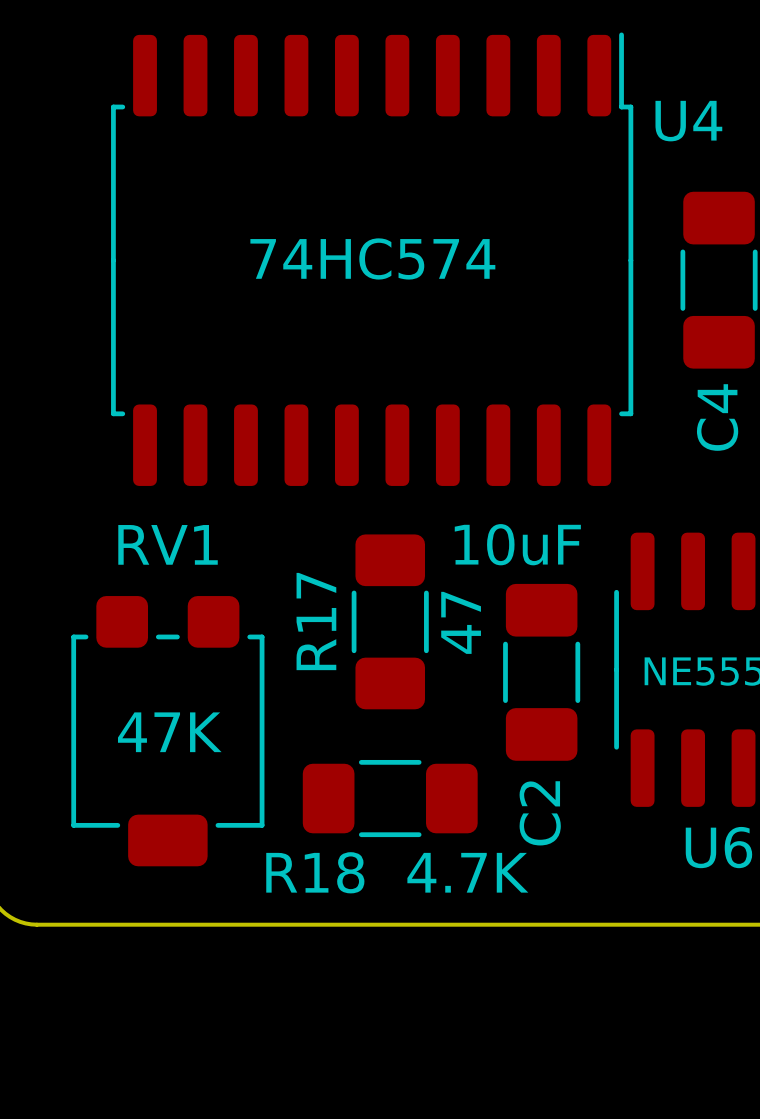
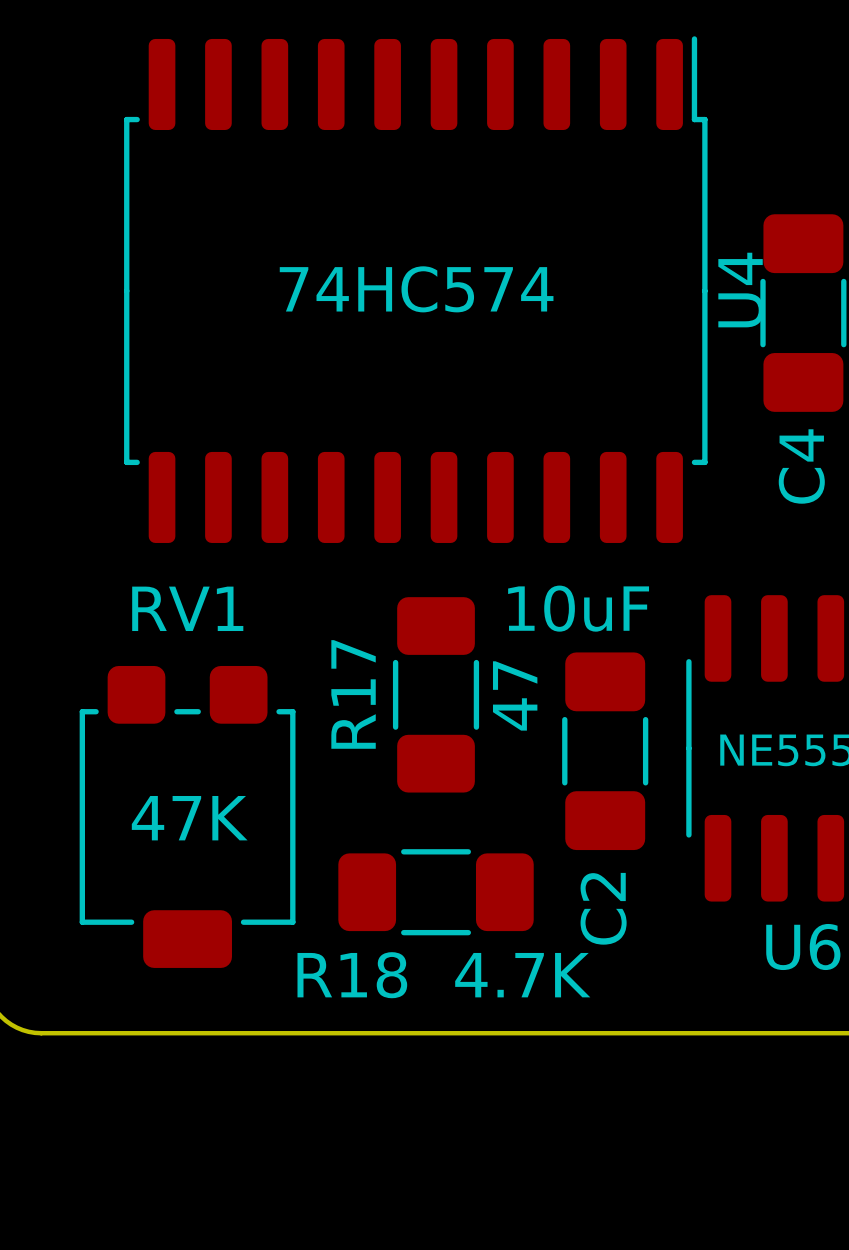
U4 name rotation: 0° (688, 121) -> 90° counterclockwise (740, 290)
U4 name position: U4 (688, 121) -> U4 (740, 290)

